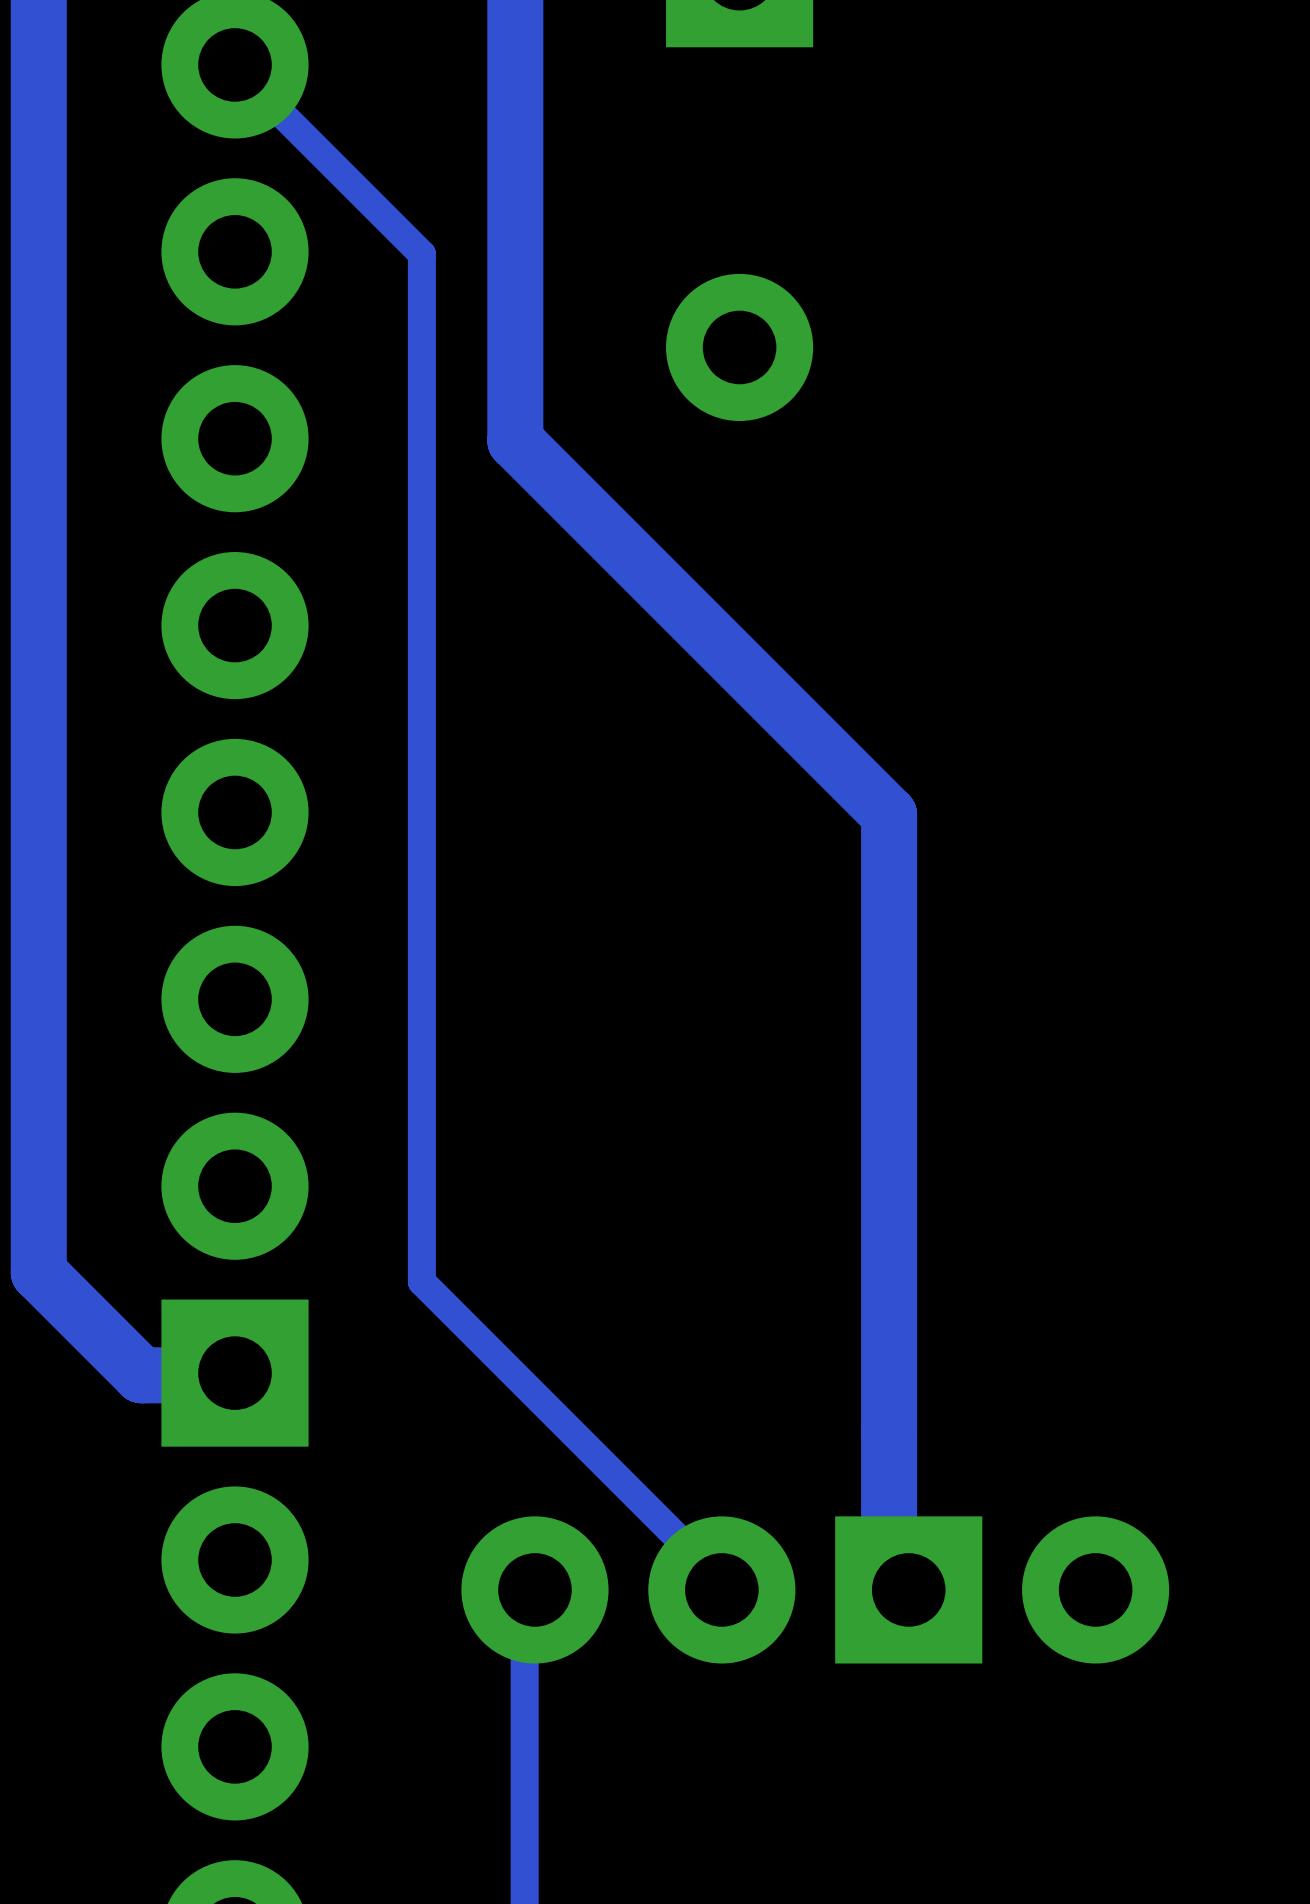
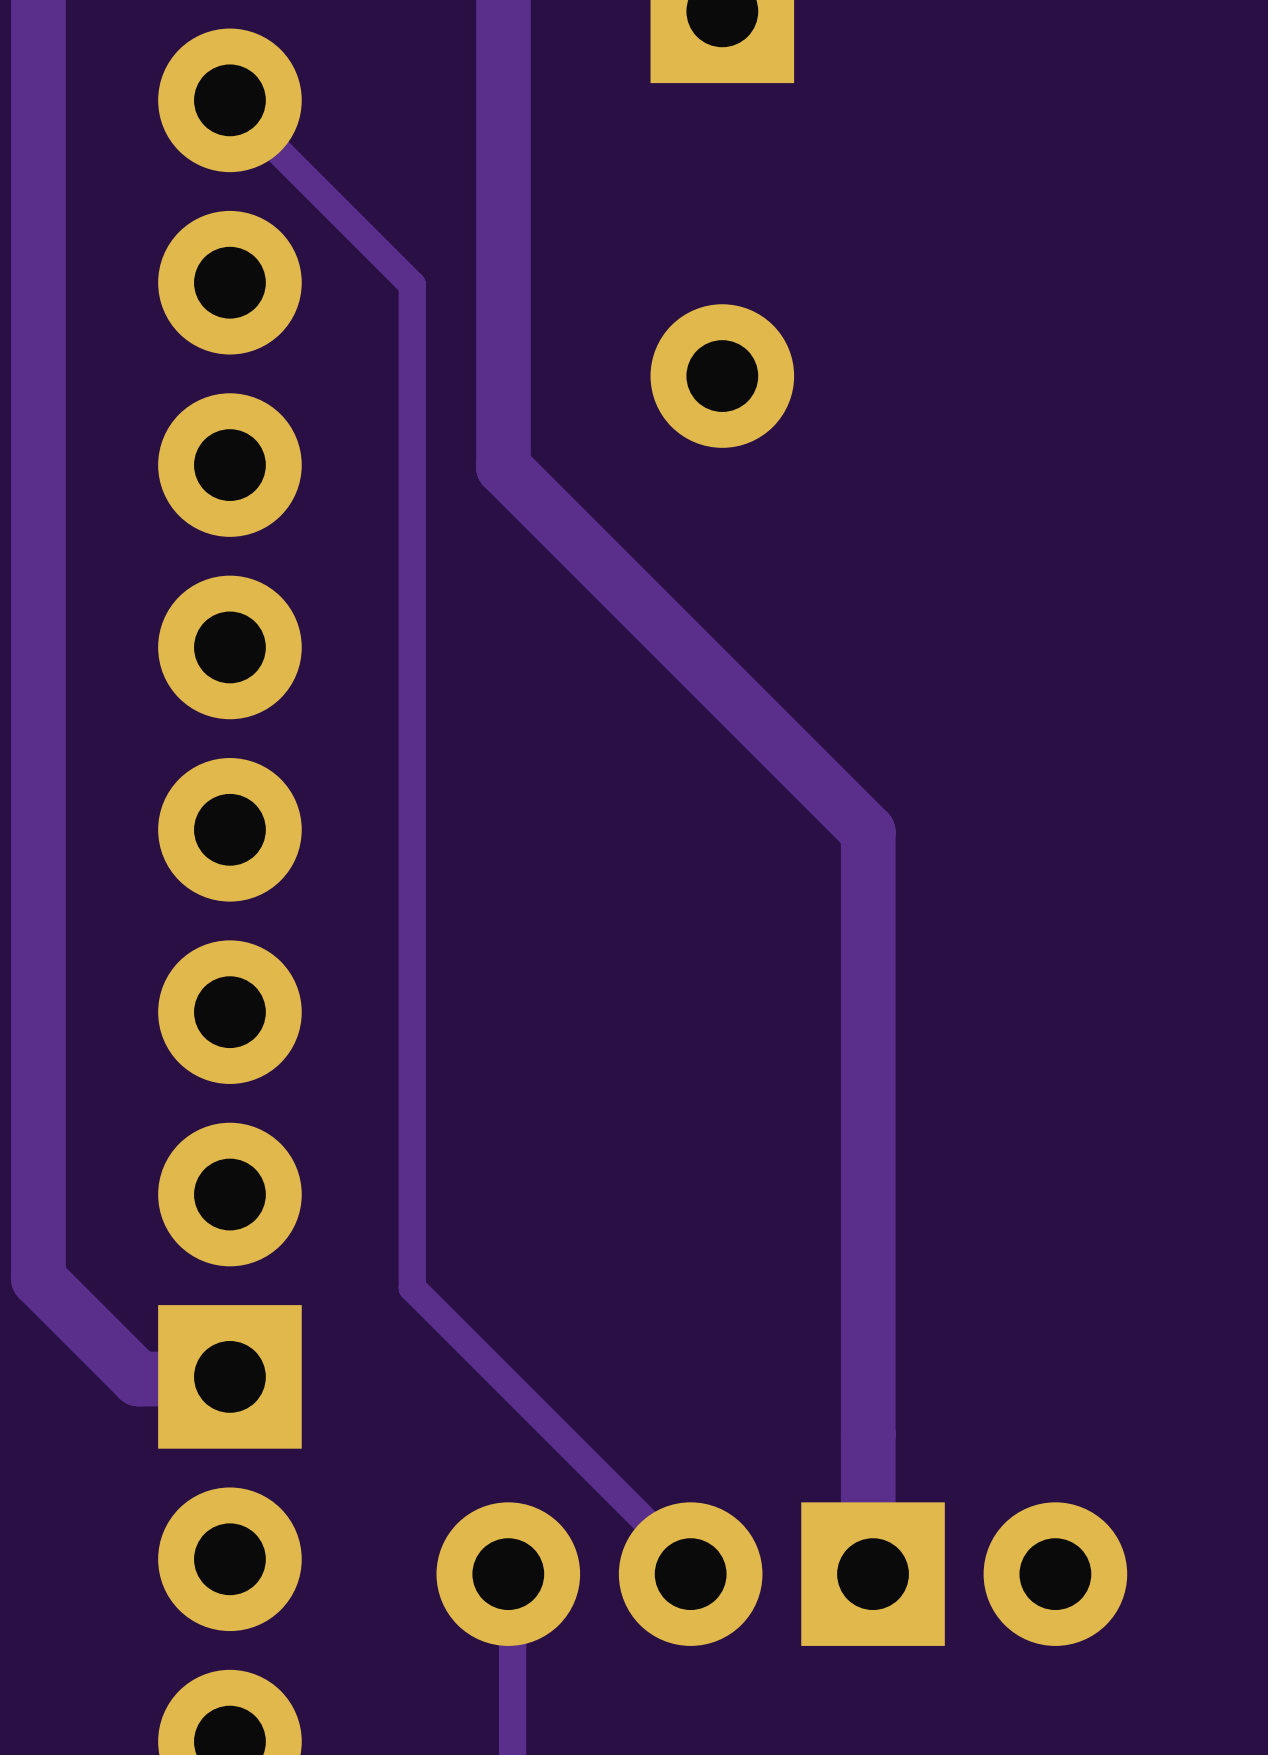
part position: (815, 1589) -> (781, 1574)

